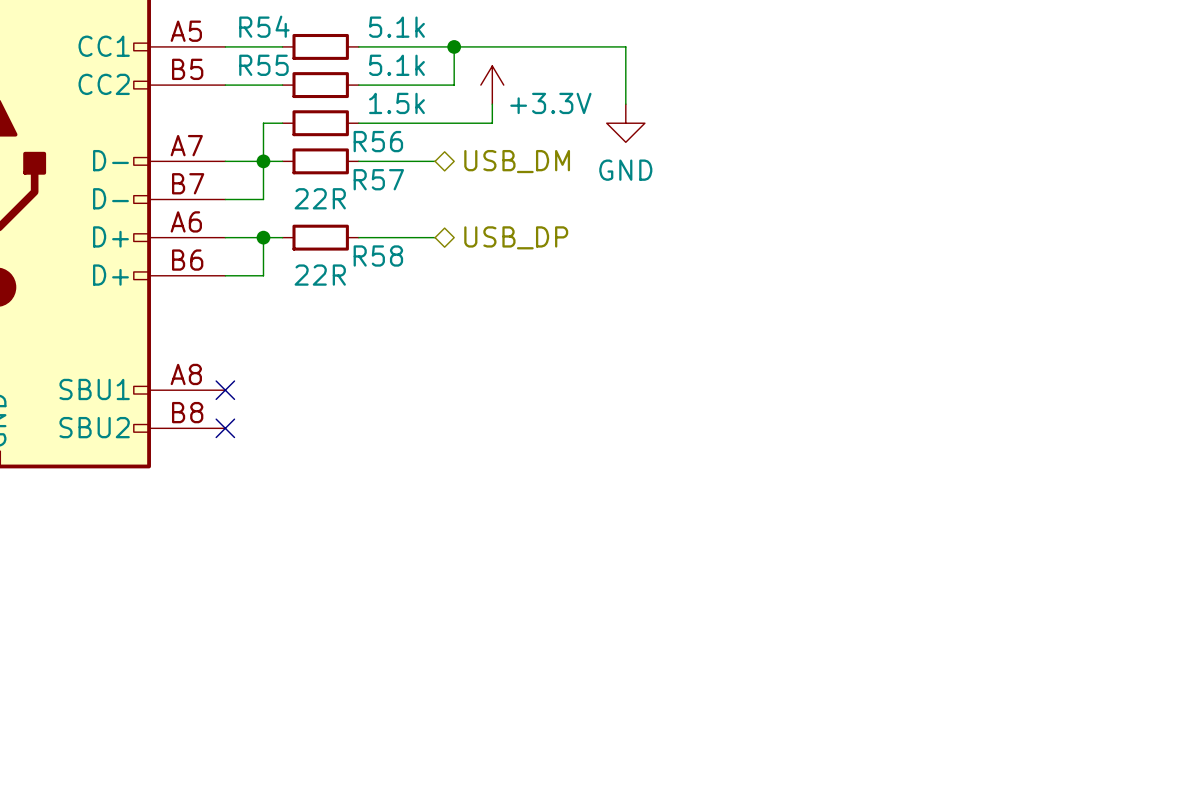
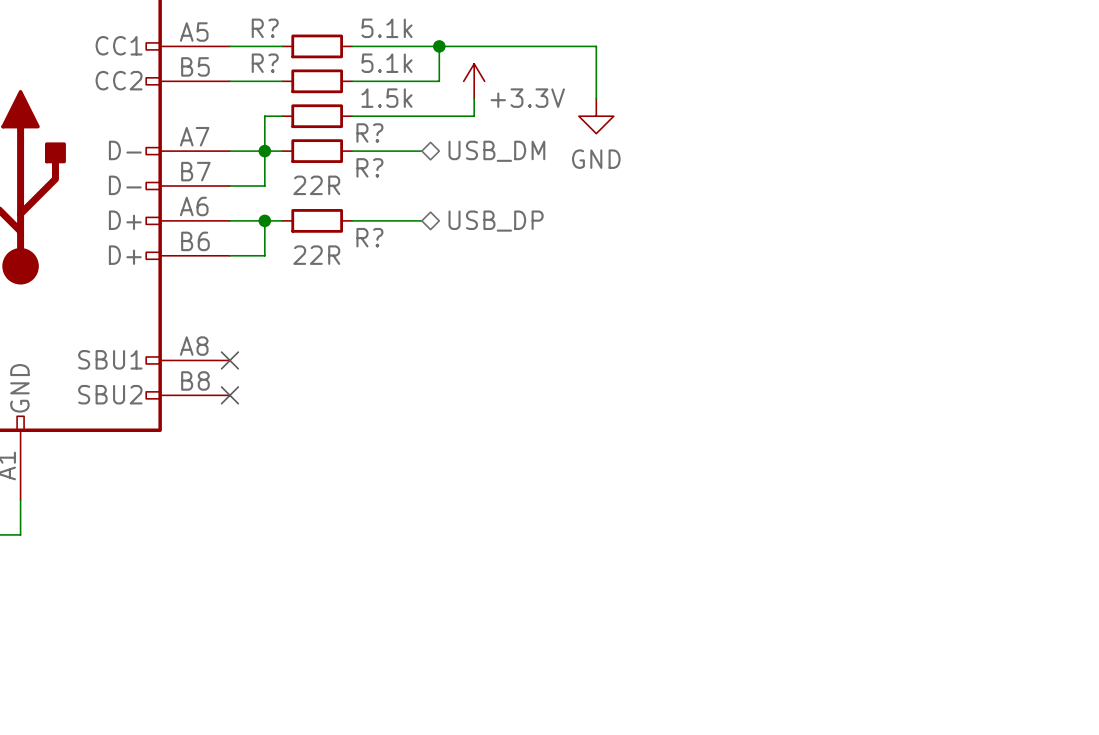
R54 name: R54 (264, 26) -> R? (265, 28)
R55 name: R55 (263, 65) -> R? (265, 63)
R56 name: R56 (378, 141) -> R? (369, 133)
R57 name: R57 (378, 179) -> R? (369, 167)
R58 name: R58 (378, 255) -> R? (369, 237)

